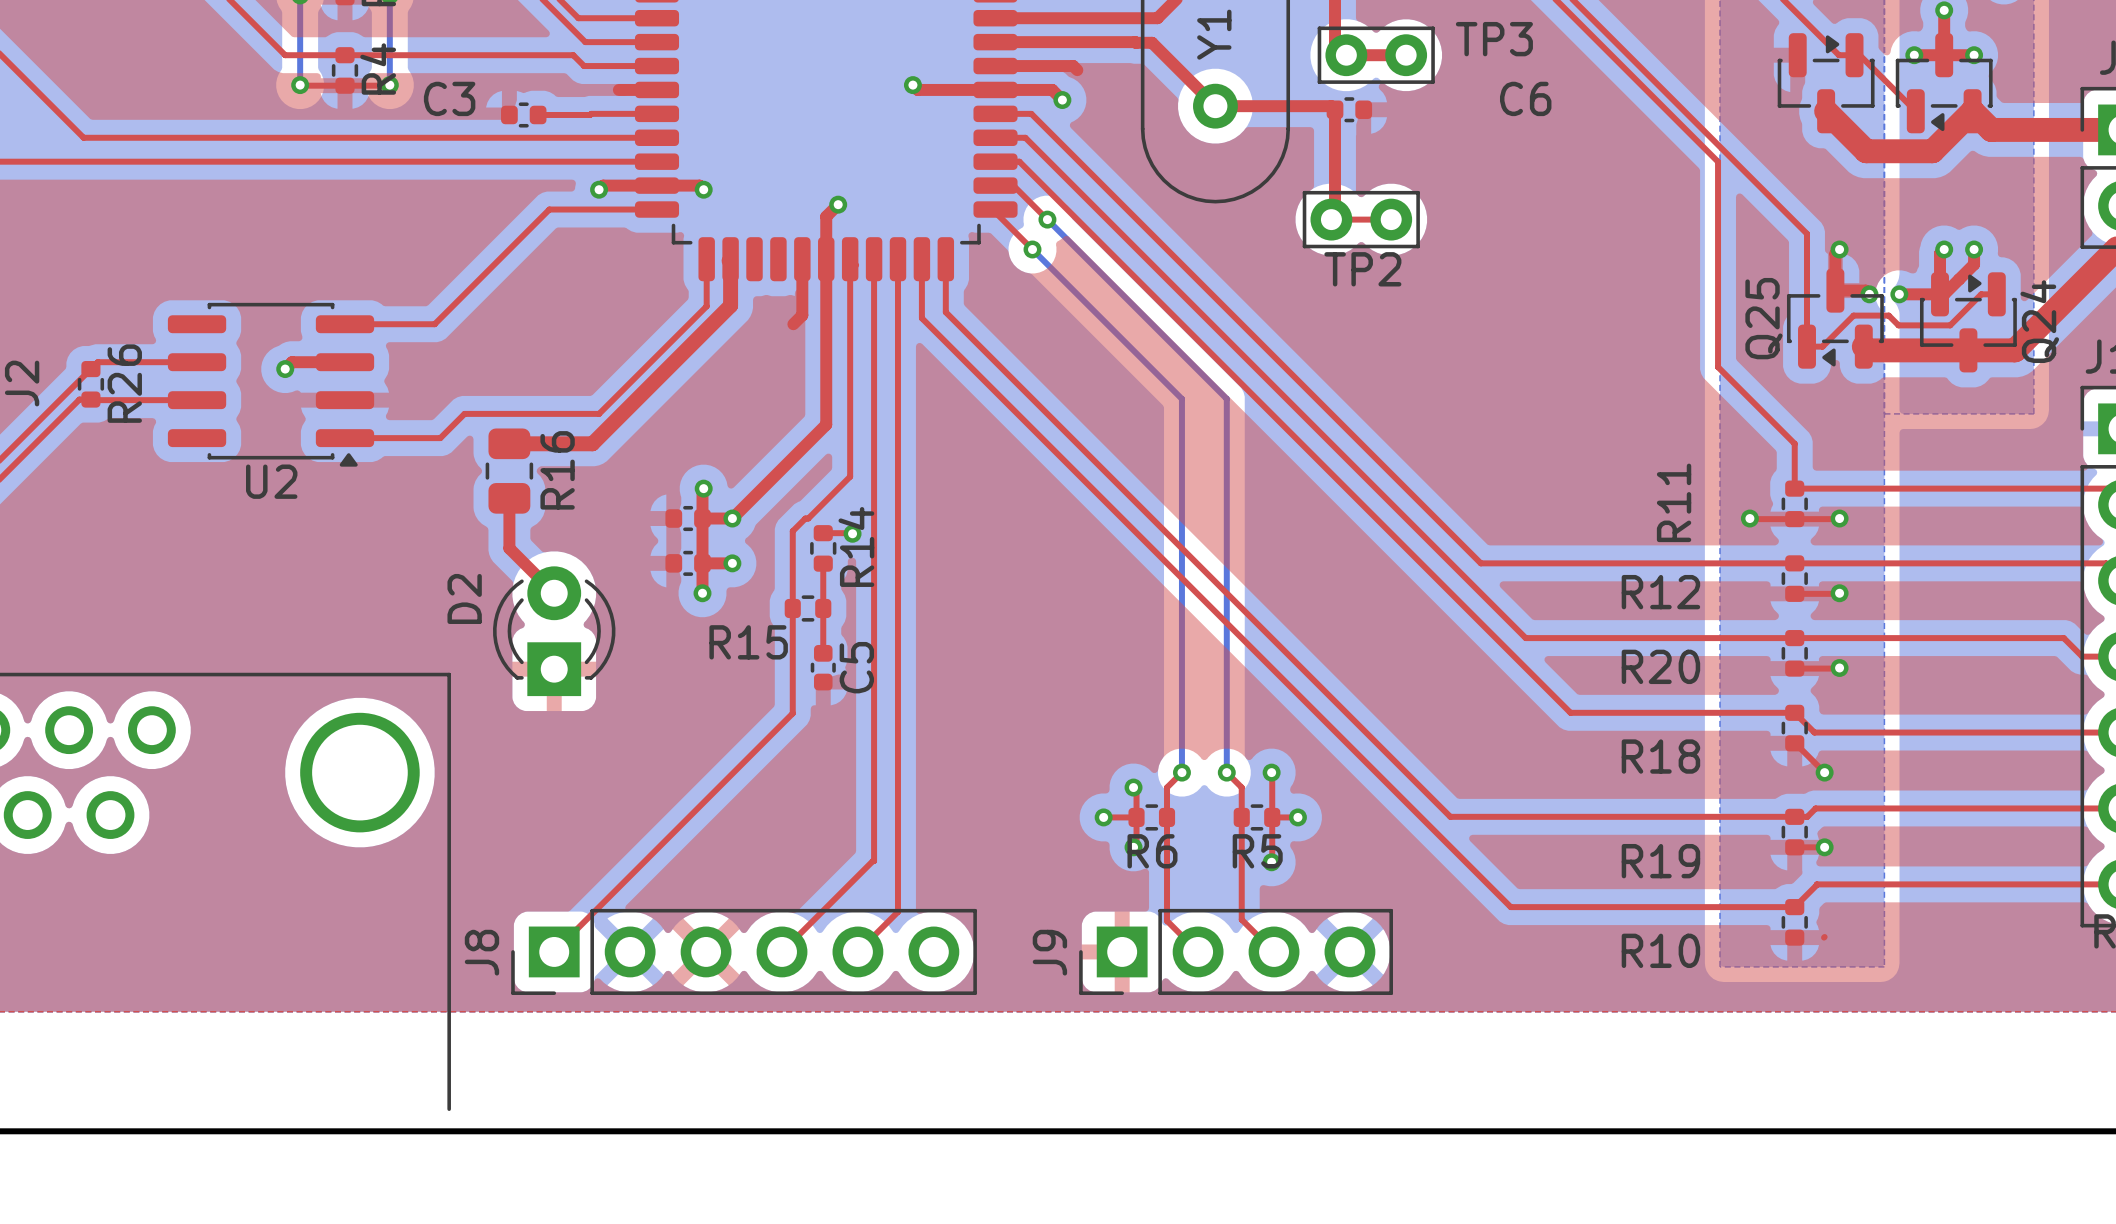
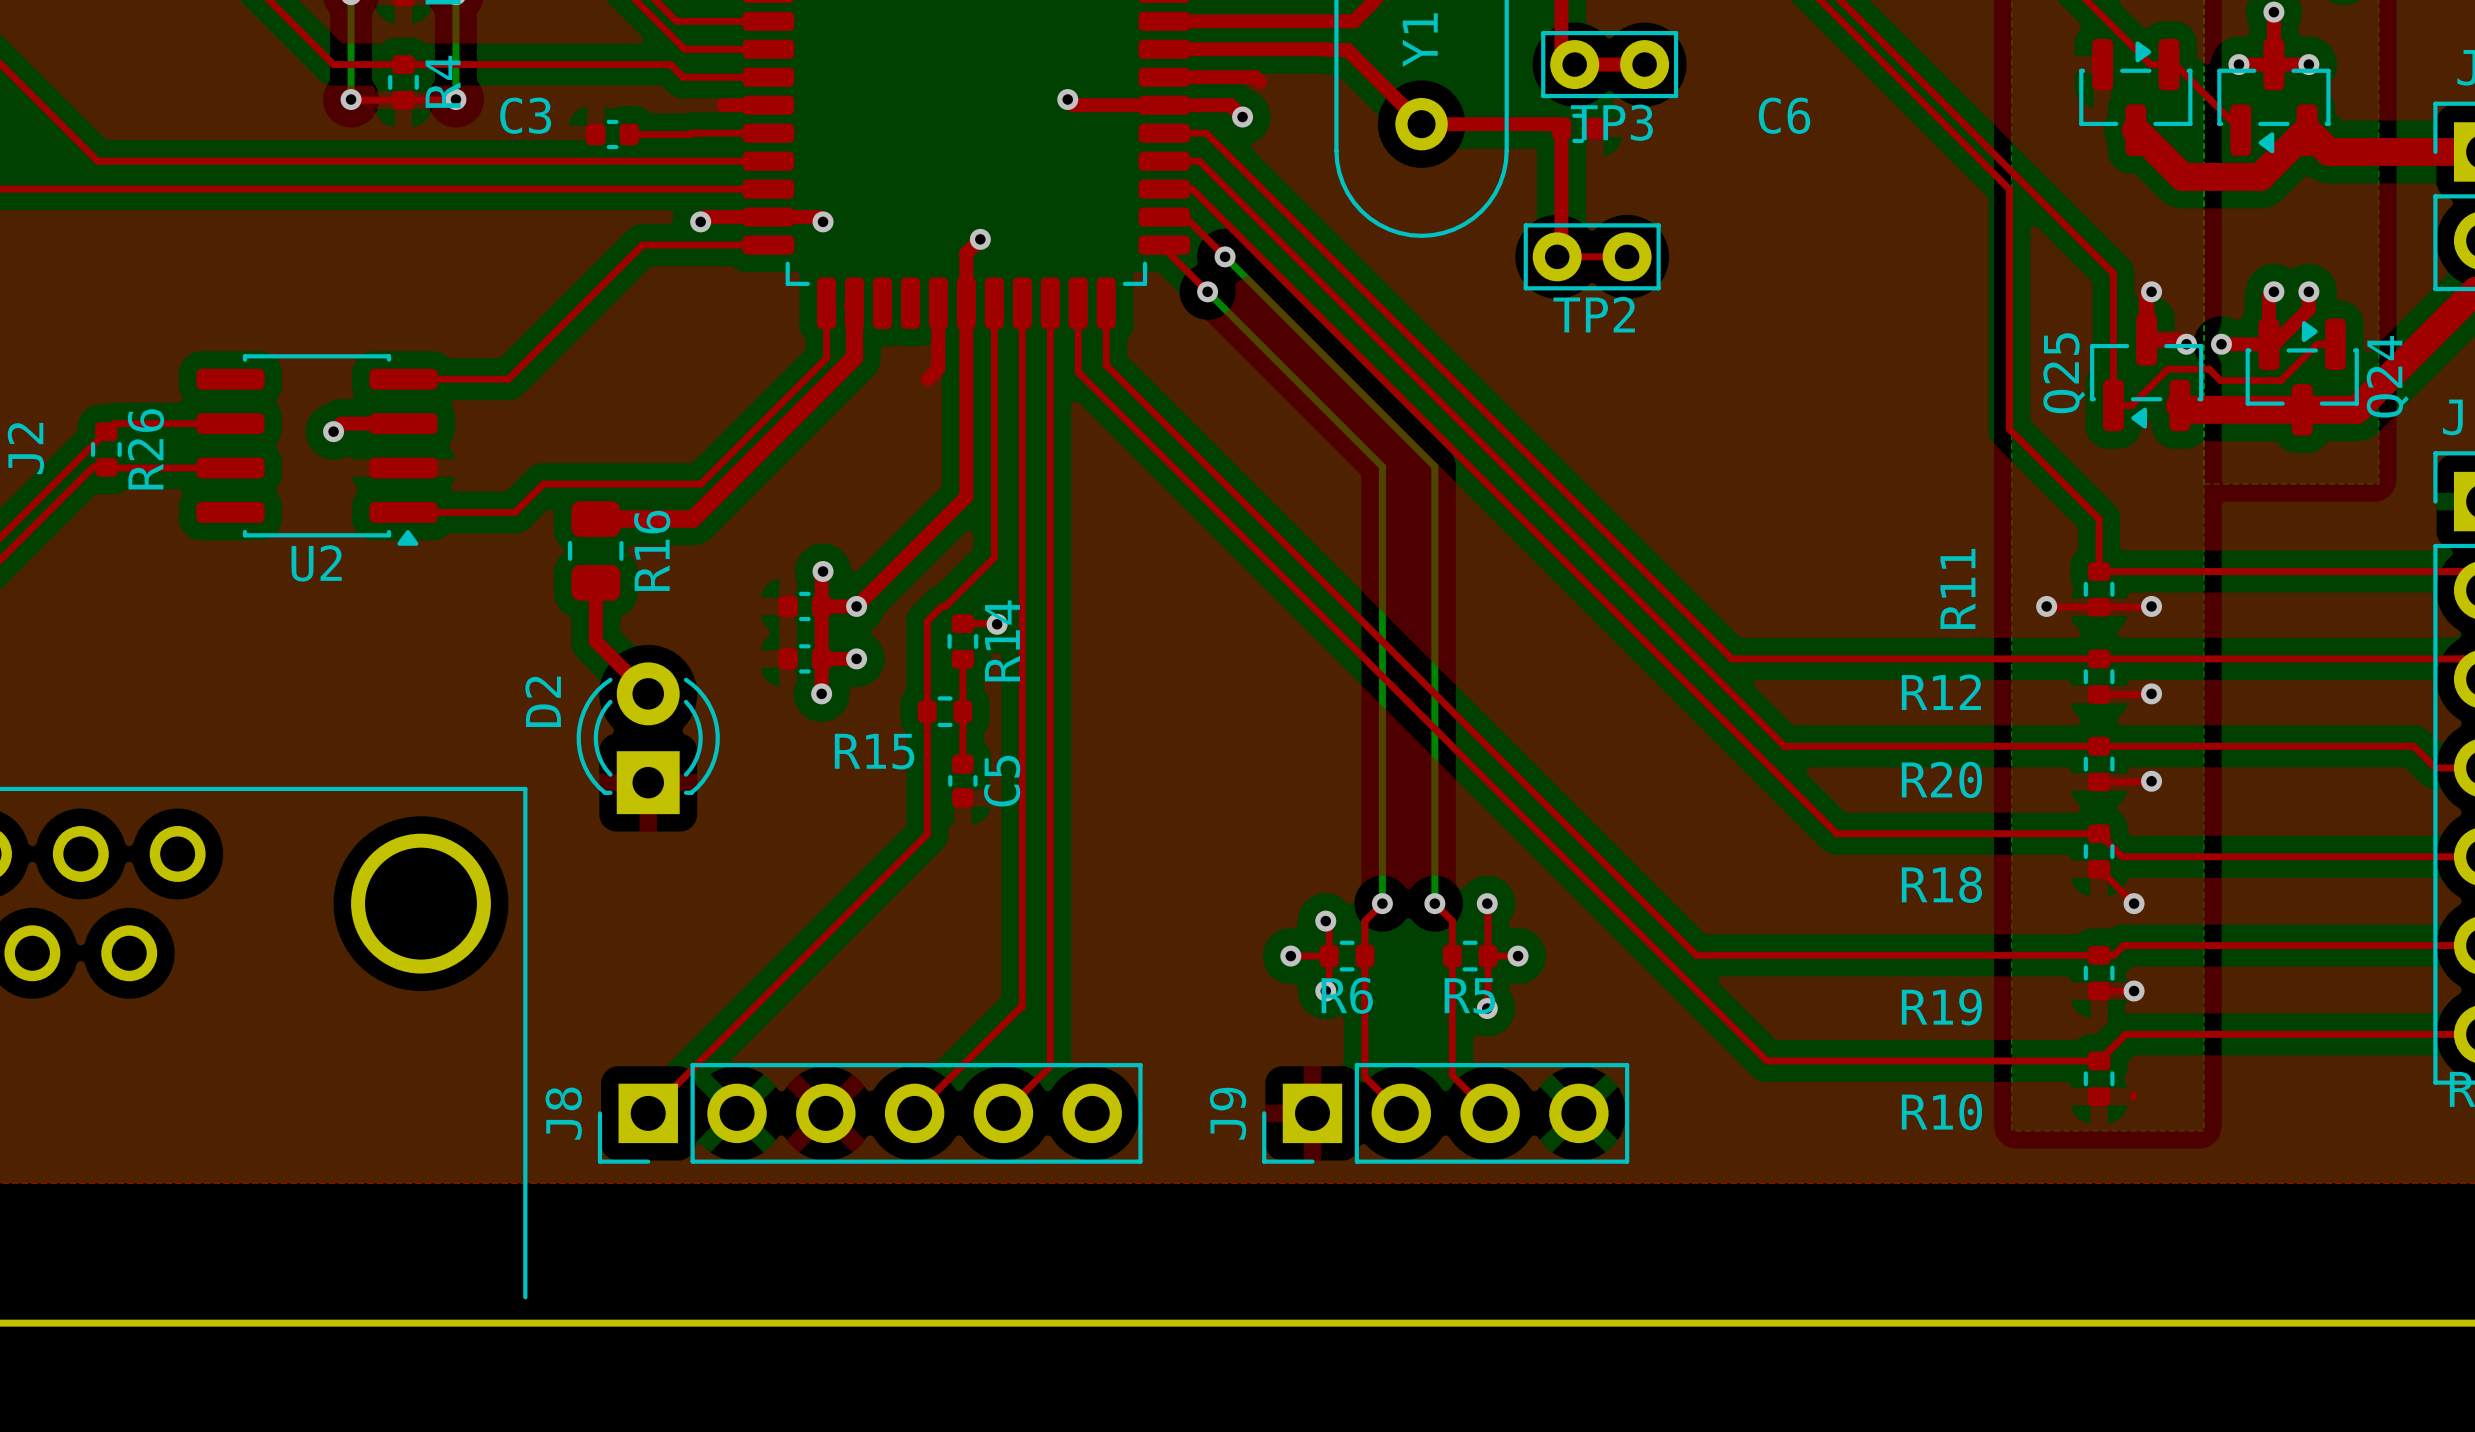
TP3 name position: TP3 (1494, 39) -> TP3 (1611, 122)

